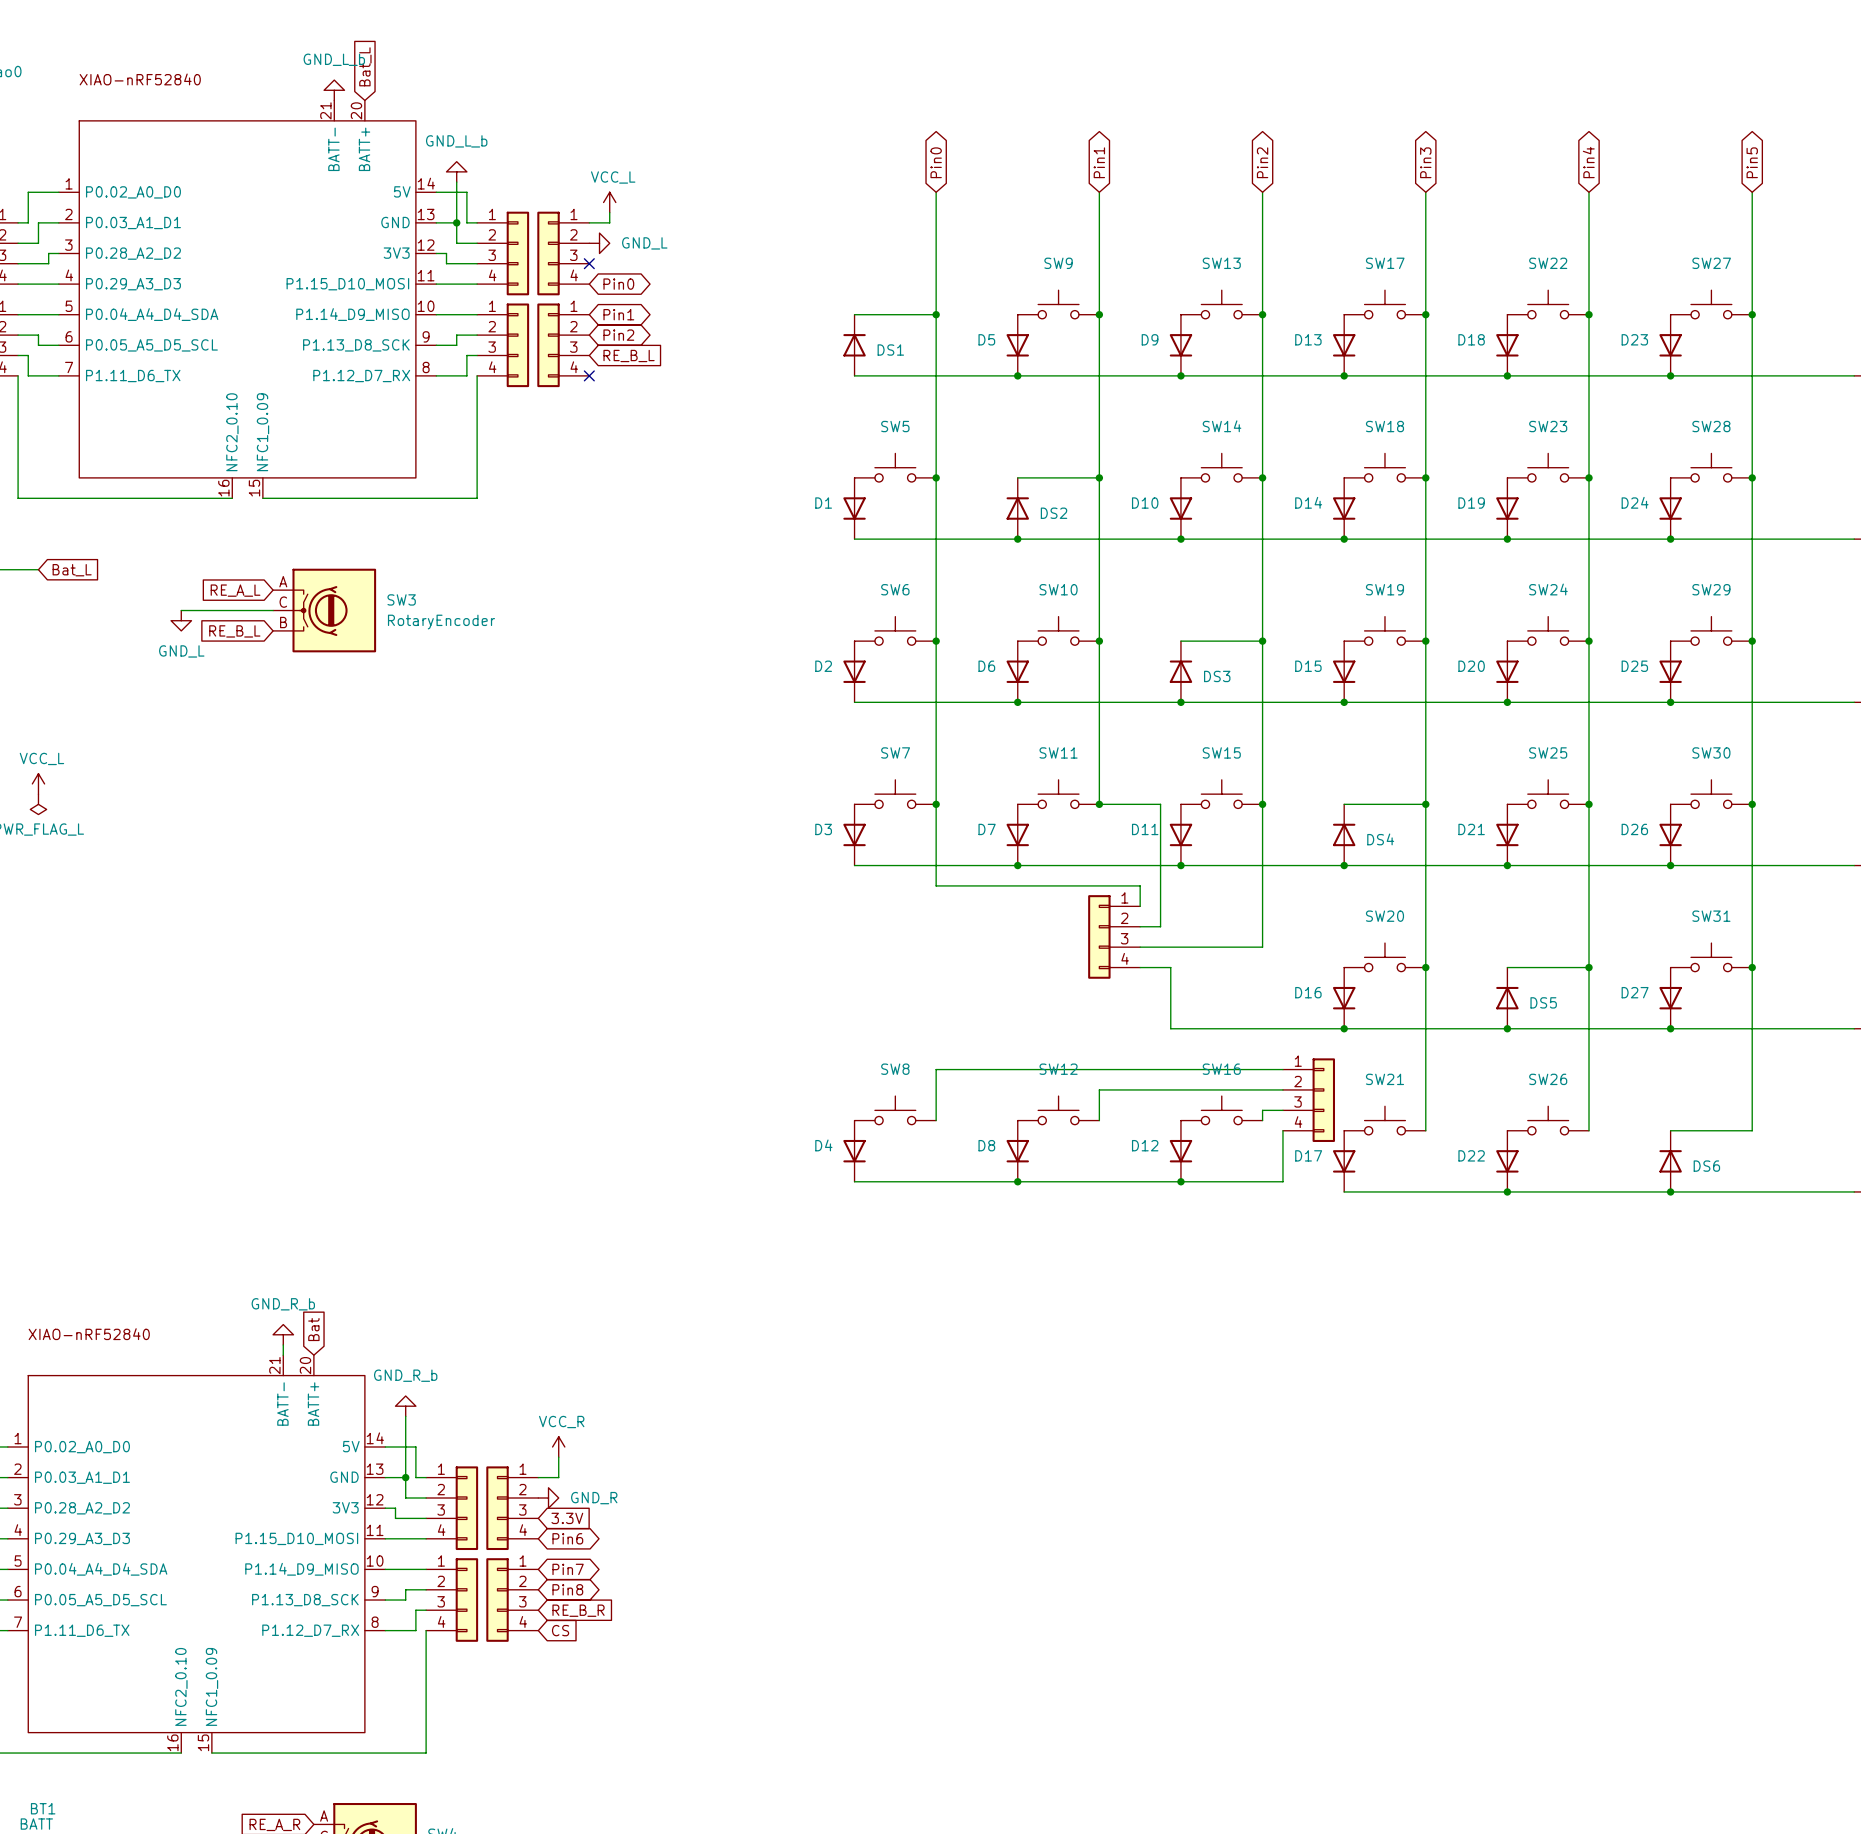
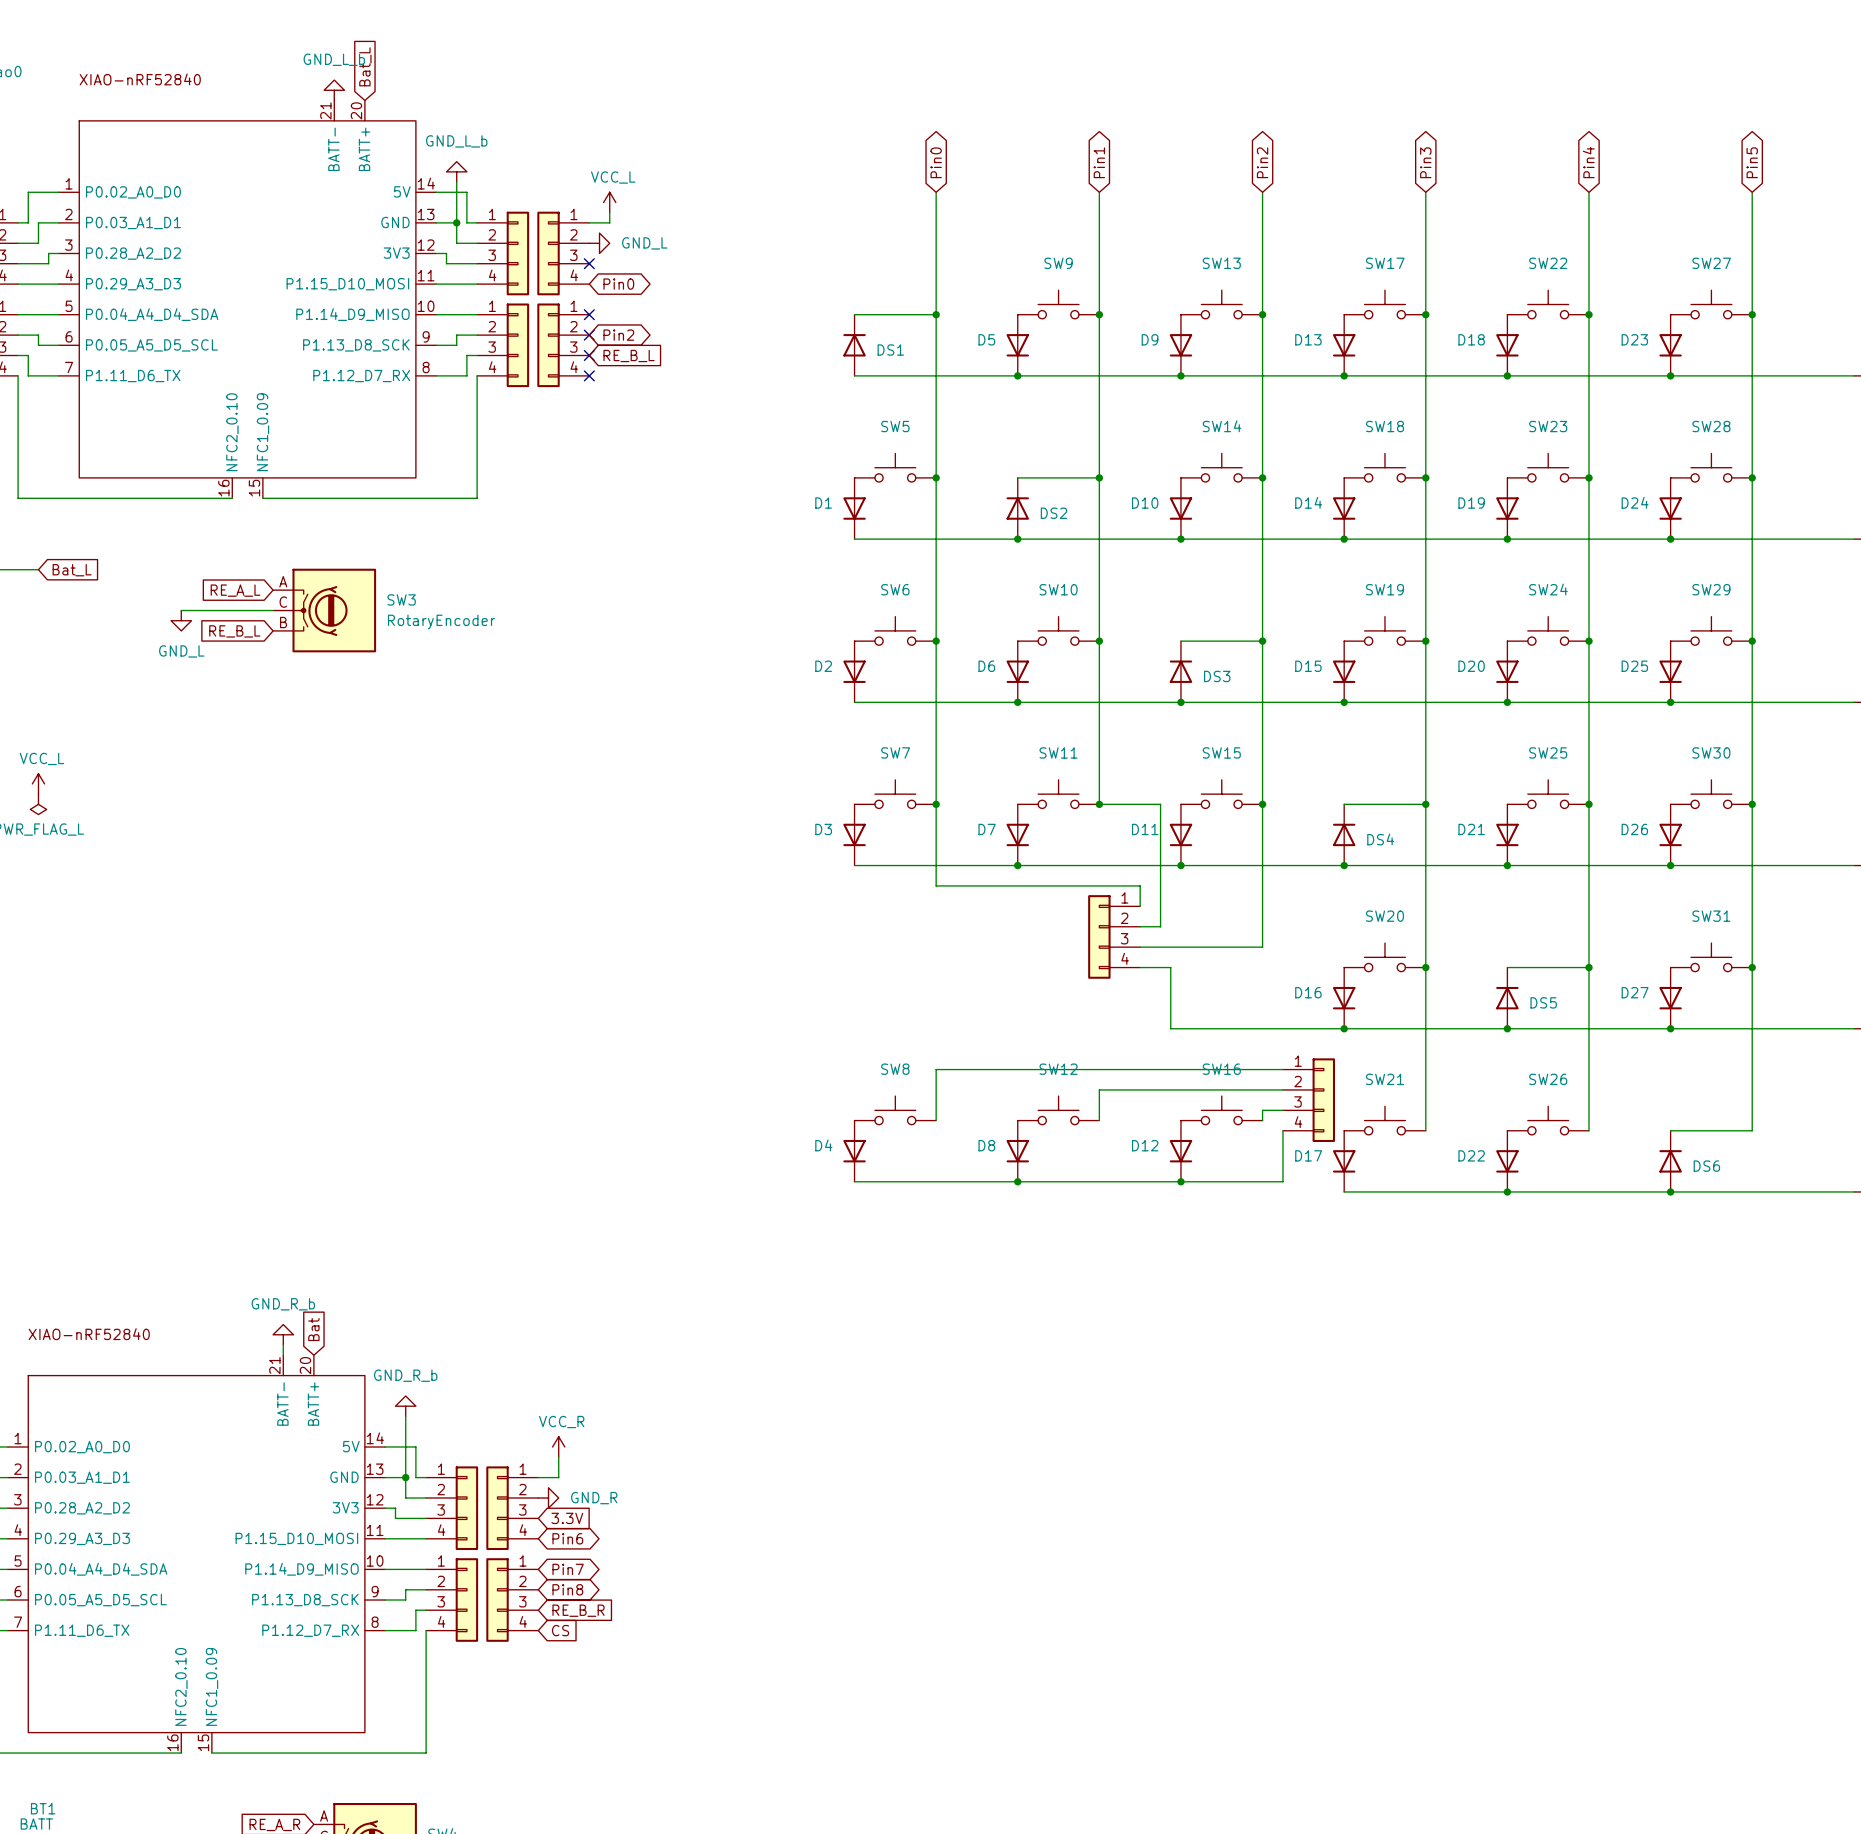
no-connect mark: none -> (589, 314)
global label: Pin1 (618, 314) -> none
no-connect mark: none -> (589, 335)
no-connect mark: none -> (589, 355)

